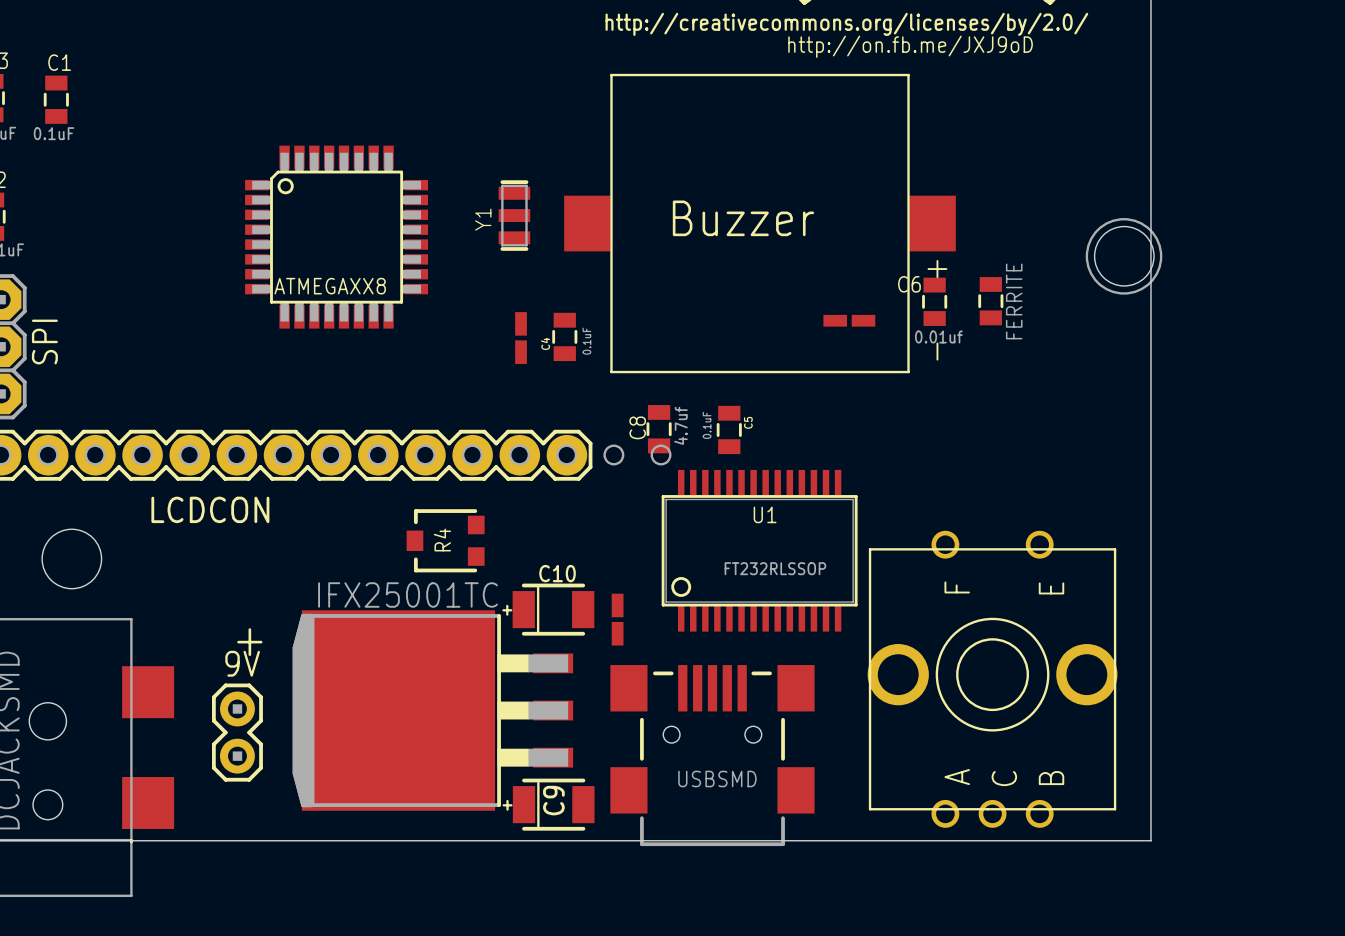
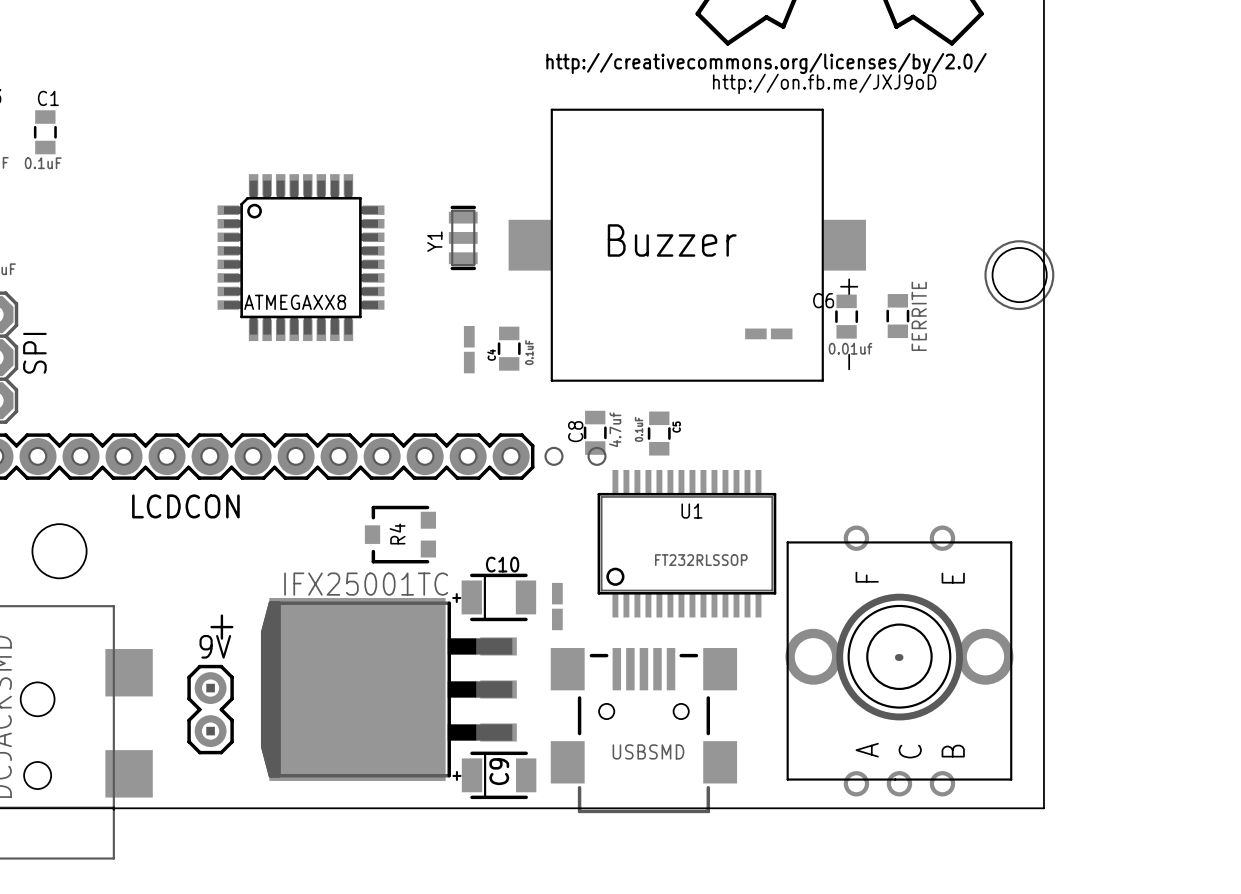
drawing: none -> [836, 593, 963, 721]
line: none -> (898, 657) (900, 657)

